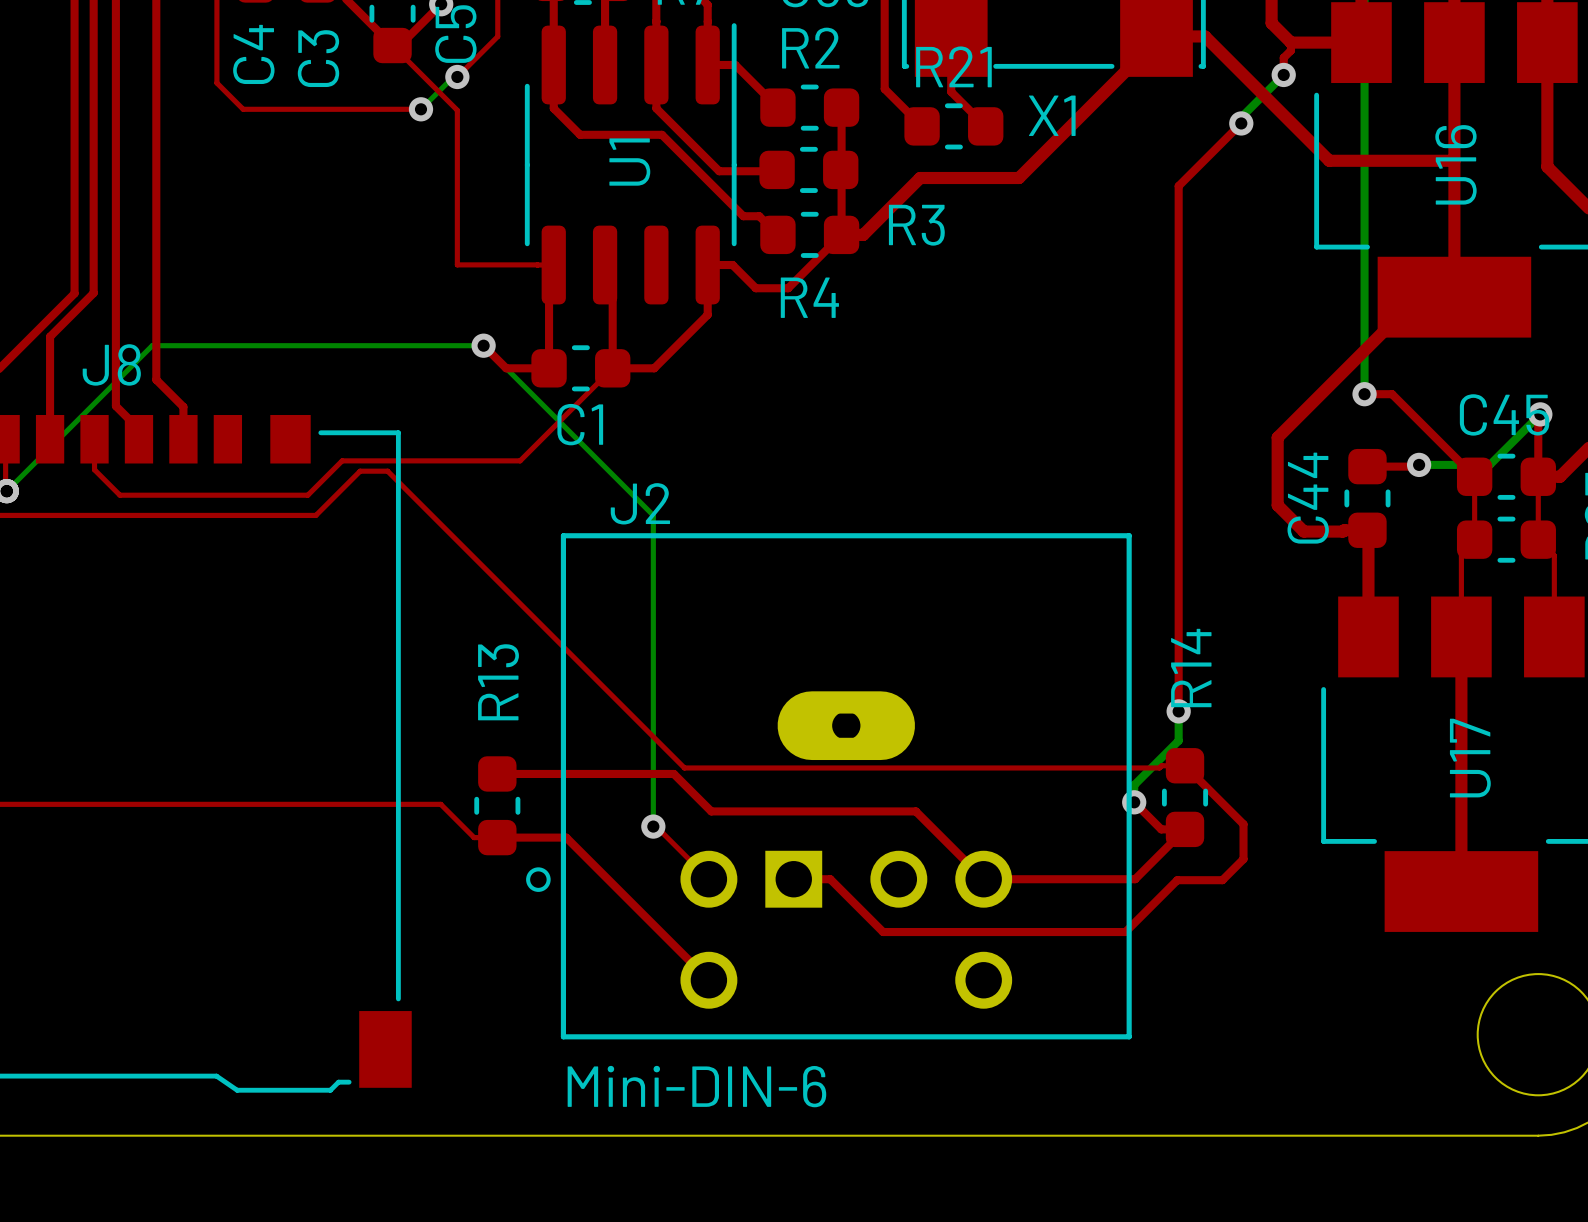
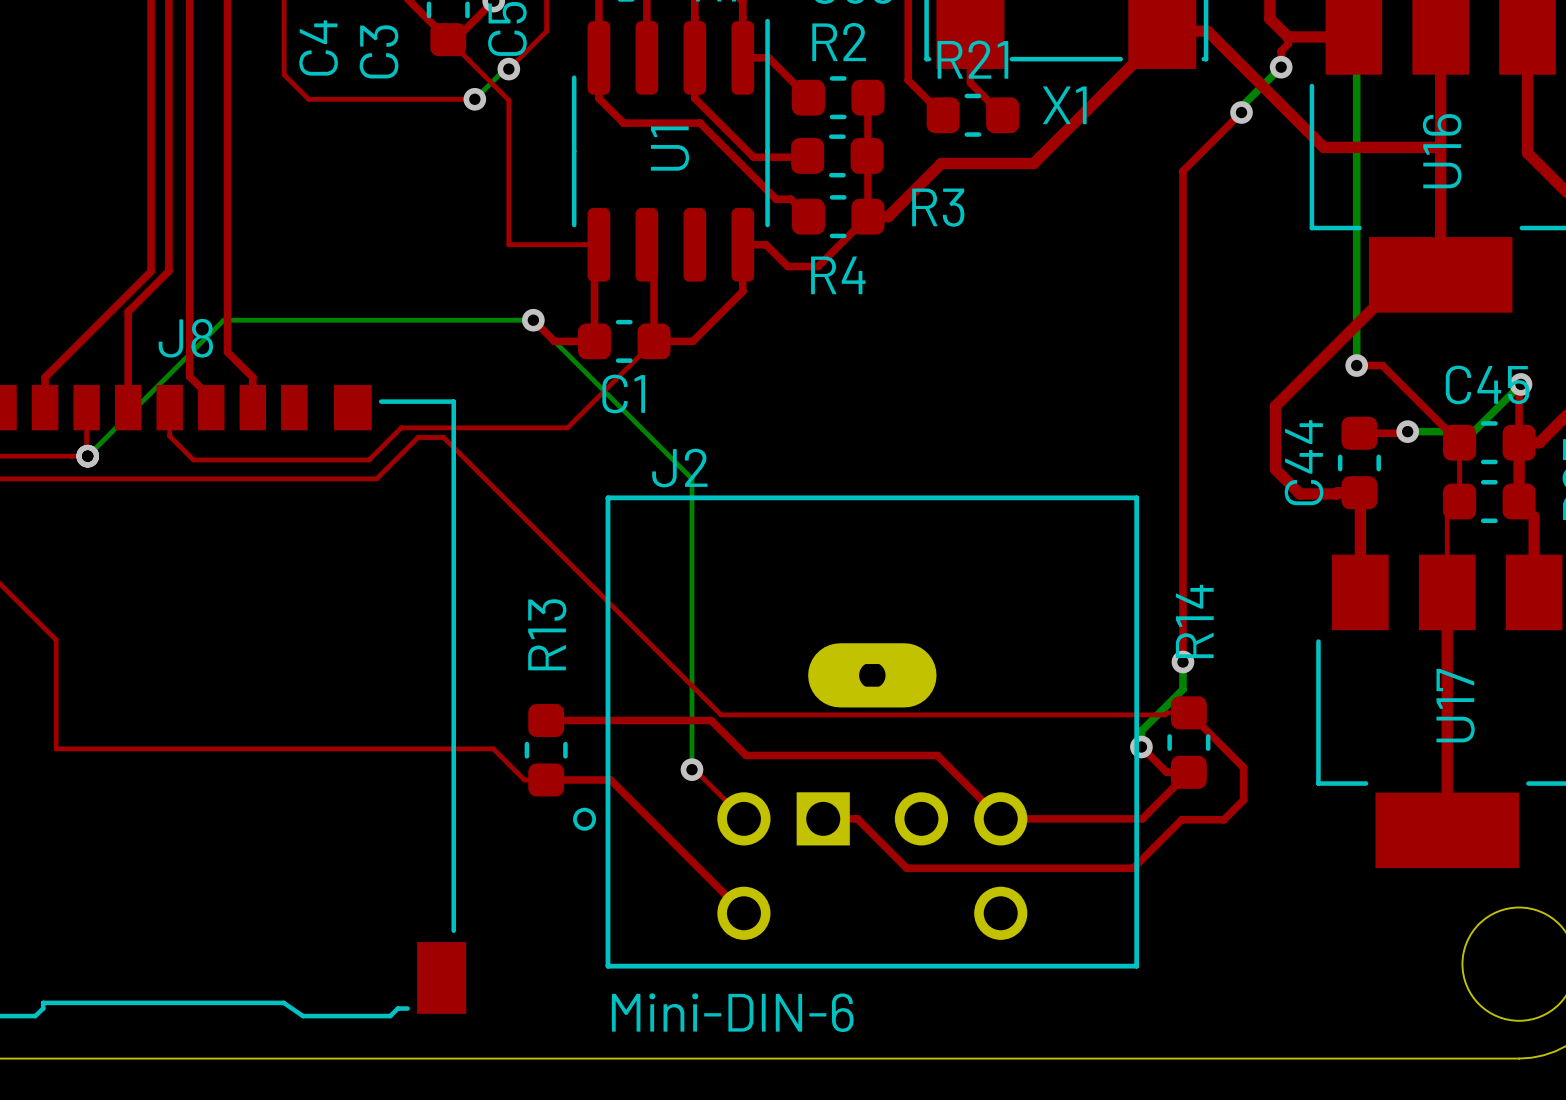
top track width: thin (1538, 476) (1538, 528) -> thick (1519, 442) (1519, 490)
top track width: thin (1554, 555) (1554, 636) -> thick (1534, 516) (1534, 592)

